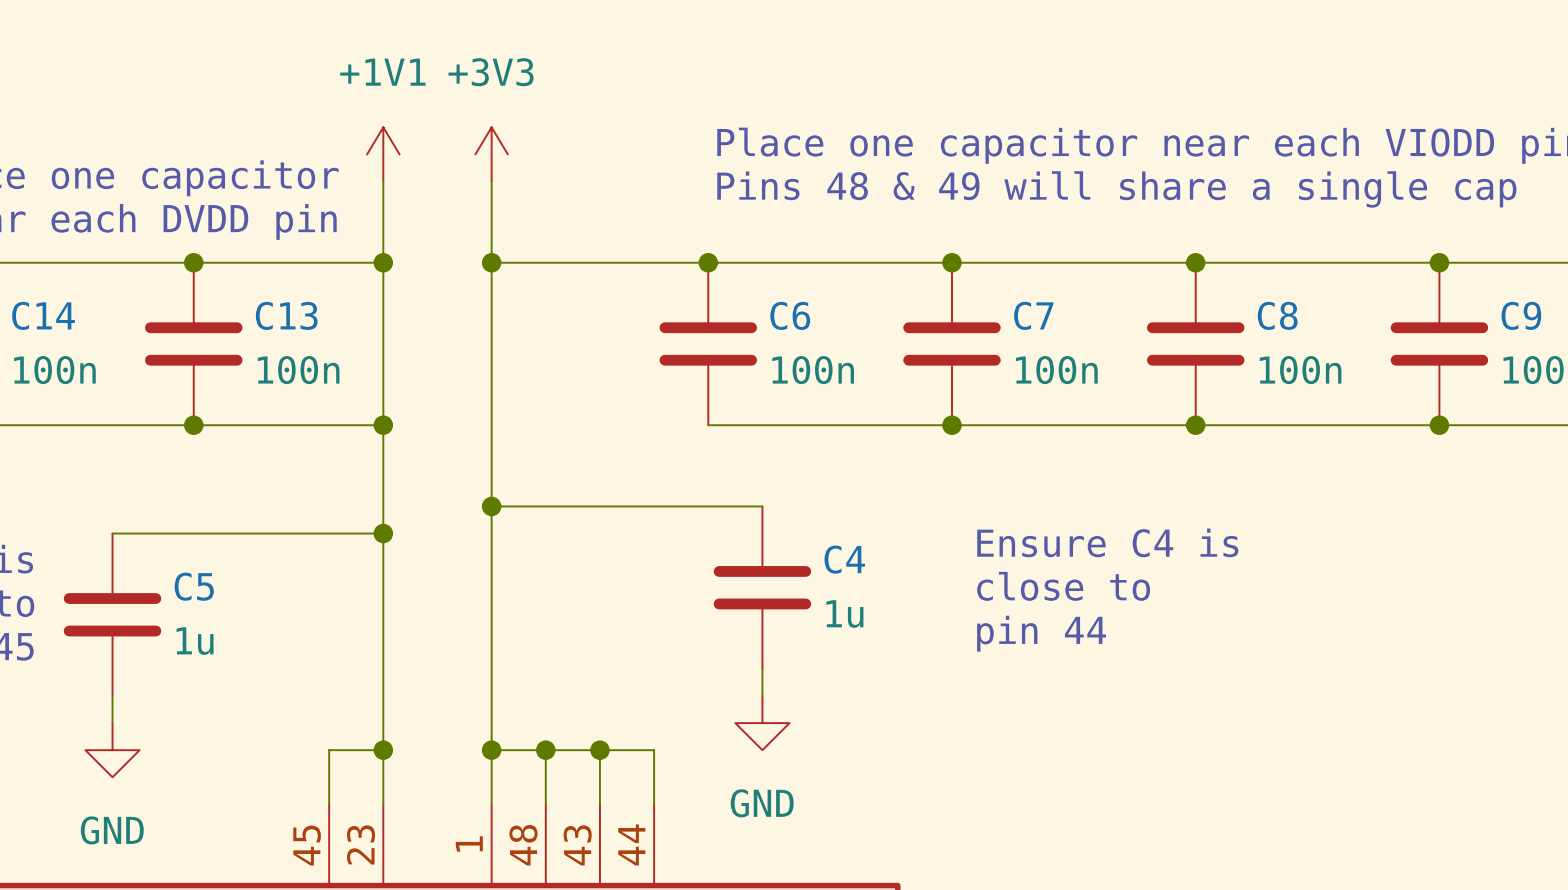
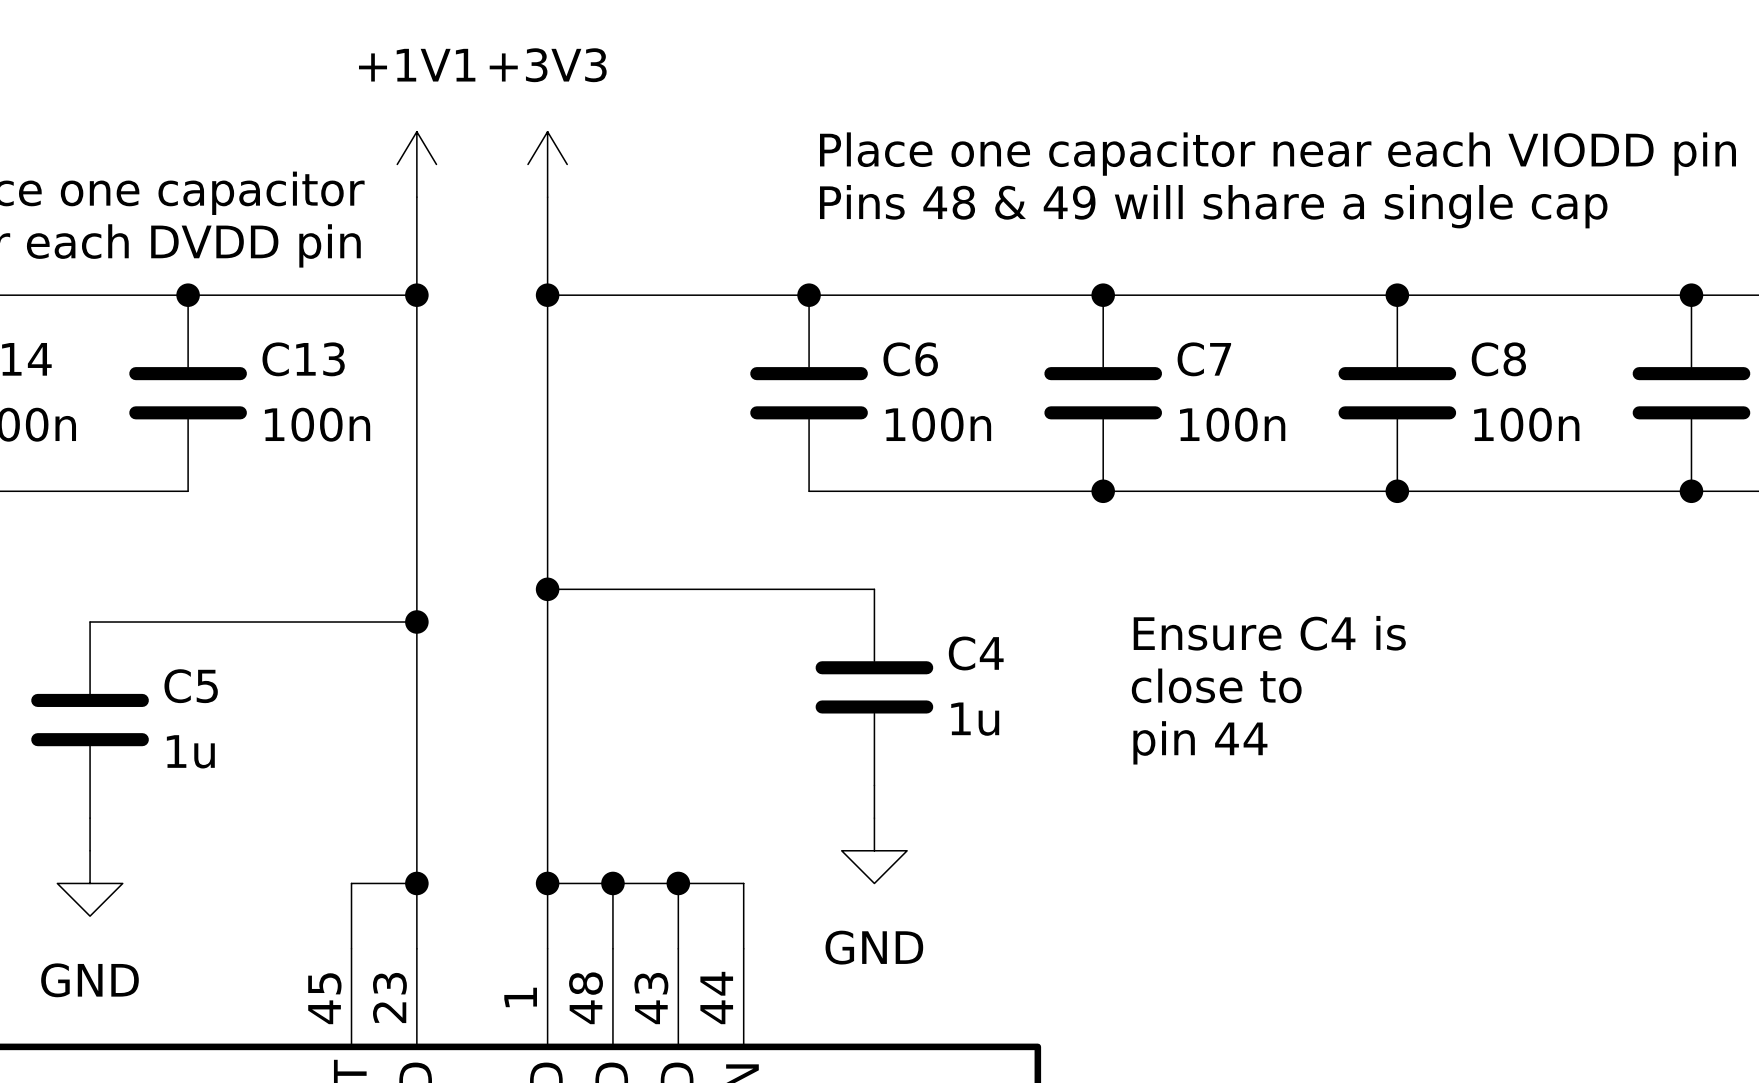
wire: (193, 425) (383, 425) -> none
junction: (193, 425) -> none
junction: (383, 425) -> none

